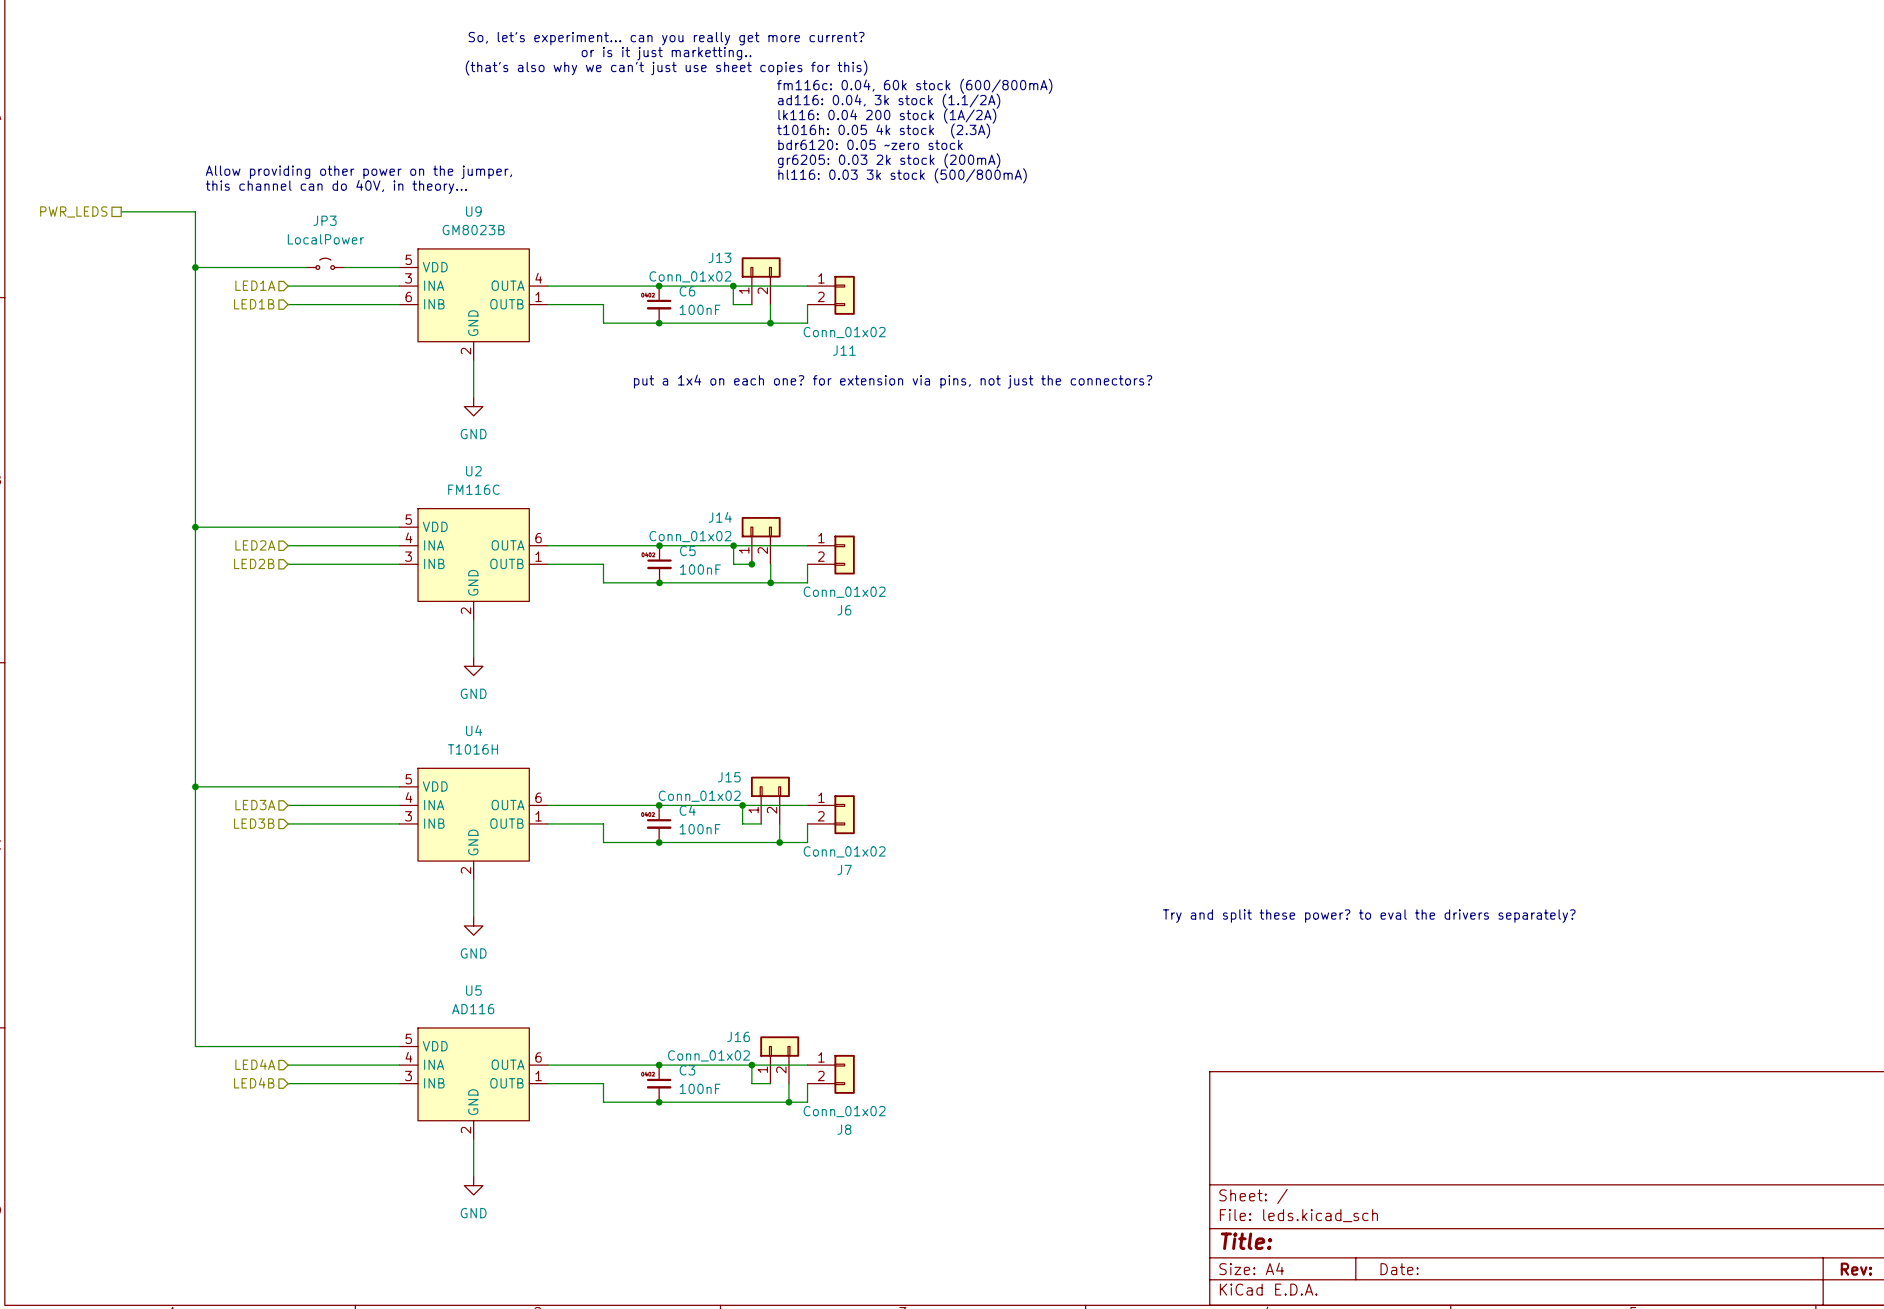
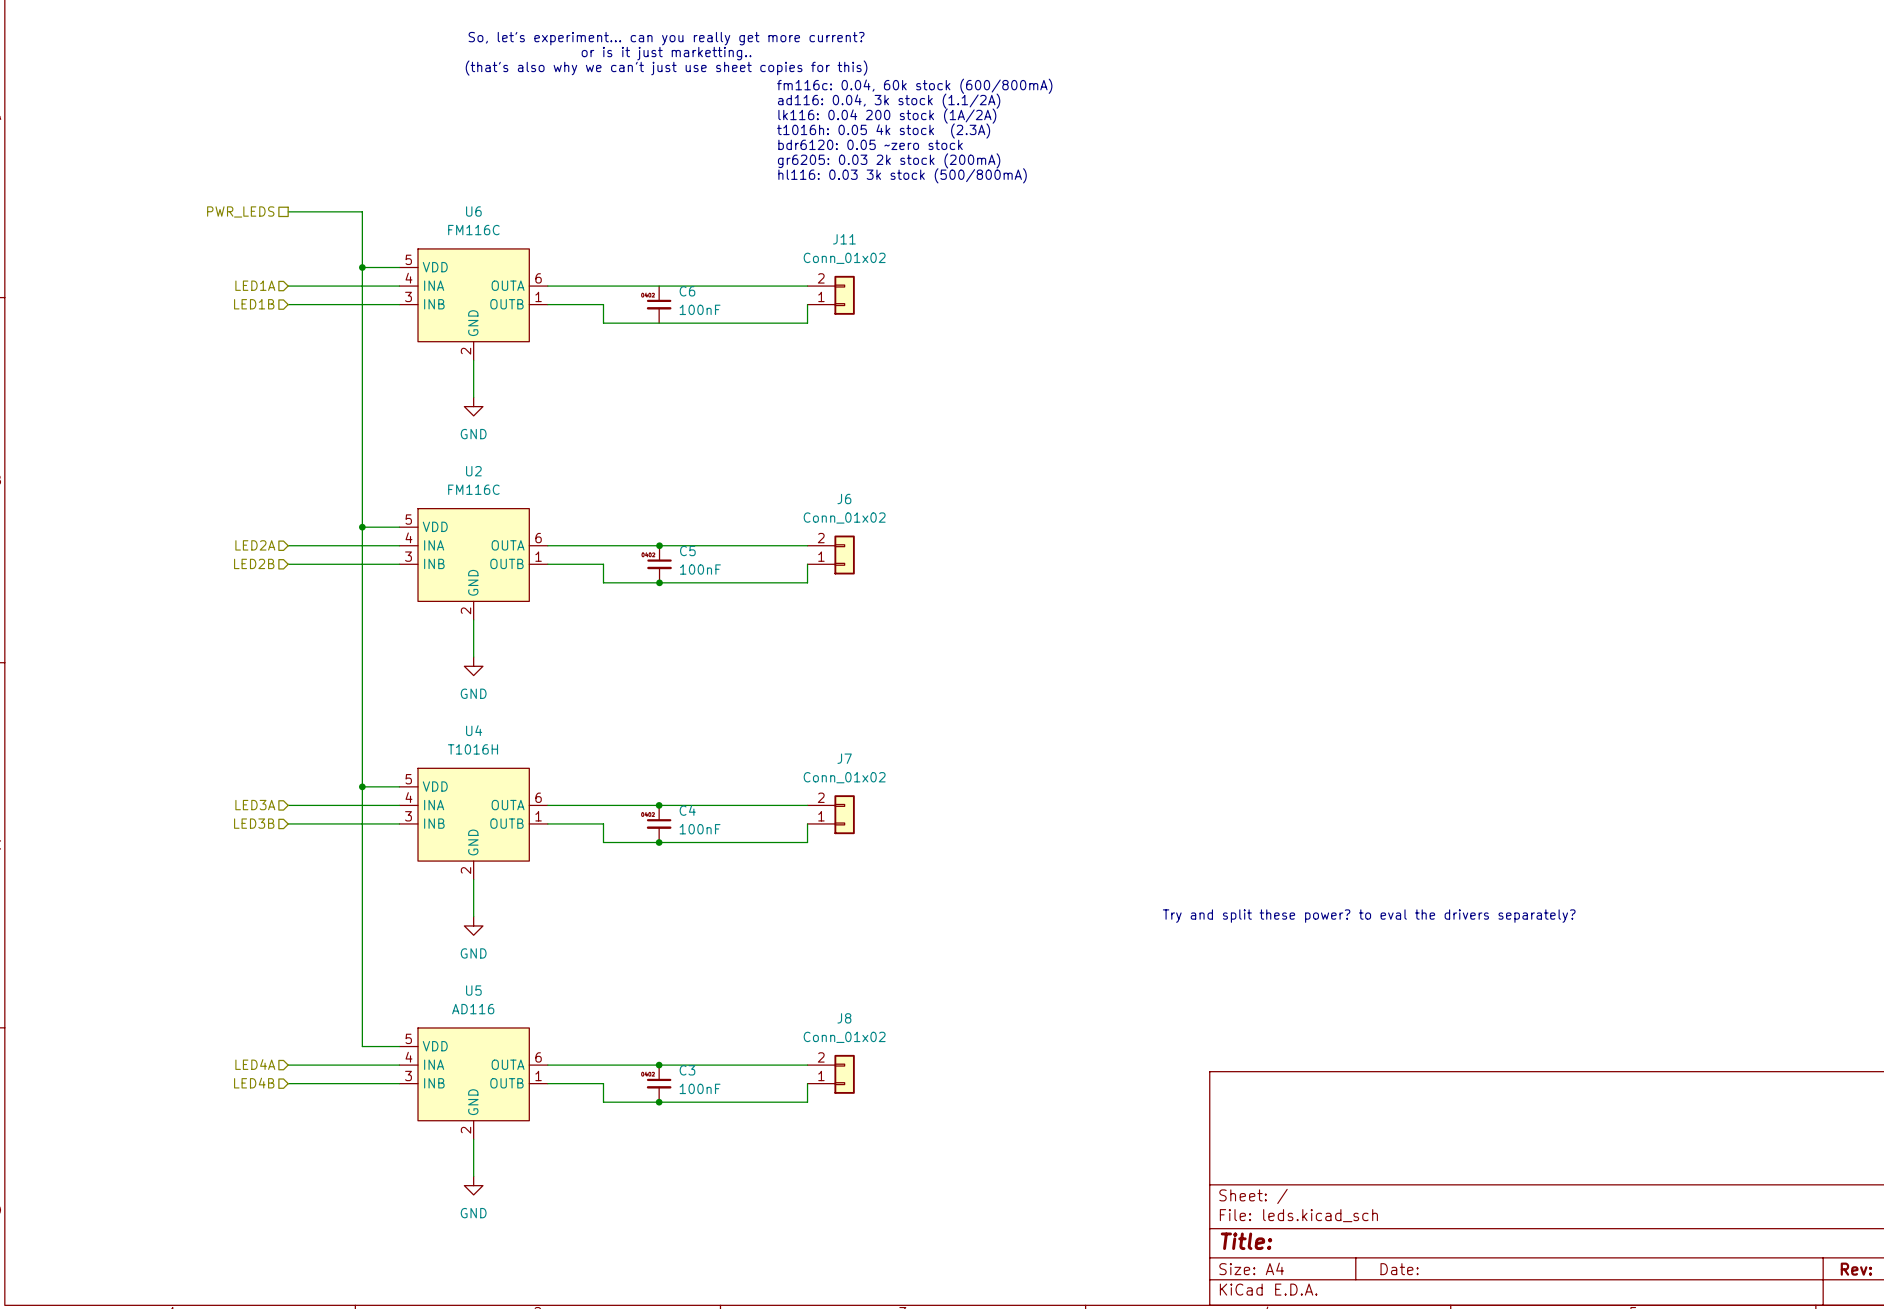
text: Allow providing other power on the jumper, (358, 172) -> none
text: this channel can do 40V, in theory... (336, 186) -> none
hierarchical label position: PWR_LEDS (73, 211) -> PWR_LEDS (240, 211)
wire: (121, 211) (195, 211) (195, 1046) (362, 1046) -> (288, 211) (362, 211) (362, 1046)
U9 name: U9 (473, 211) -> U6 (473, 211)
U9 value: GM8023B (473, 230) -> FM116C (473, 230)
JP3: LocalPower (325, 263) -> none
wire: (195, 267) (306, 267) -> none
junction: (195, 267) -> none
wire: (343, 267) (362, 267) -> none
junction: none -> (362, 267)
U9 pin number: 3 (408, 278) -> 4 (408, 278)
U9 pin number: 4 (538, 278) -> 6 (538, 278)
J13: Conn_01x02 (761, 280) -> none
junction: (659, 286) -> none
wire: (733, 286) (733, 304) (751, 304) -> none
junction: (733, 286) -> none
J11 flip: as is (844, 295) -> up-down (844, 295)
U9 pin number: 6 (408, 296) -> 3 (408, 296)
wire: (770, 304) (770, 323) -> none
junction: (659, 323) -> none
junction: (770, 323) -> none
text: put a 1x4 on each one? for extension via pins, not just the connectors? (893, 381) -> none
wire: (195, 527) (362, 527) -> none
junction: (195, 527) -> none
junction: none -> (362, 527)
J14: Conn_01x02 (761, 540) -> none
wire: (733, 545) (733, 564) (752, 564) -> none
junction: (733, 545) -> none
J6 flip: as is (844, 555) -> up-down (844, 555)
junction: (751, 564) -> none
wire: (770, 564) (770, 582) -> none
junction: (770, 582) -> none
wire: (195, 786) (362, 786) -> none
junction: (195, 786) -> none
junction: none -> (362, 786)
J15: Conn_01x02 (770, 800) -> none
wire: (742, 805) (742, 823) (761, 823) -> none
junction: (742, 805) -> none
J7 flip: as is (844, 814) -> up-down (844, 814)
wire: (779, 823) (779, 842) -> none
junction: (779, 842) -> none
J16: Conn_01x02 (779, 1059) -> none
wire: (751, 1065) (751, 1083) (770, 1083) -> none
junction: (751, 1065) -> none
J8 flip: as is (844, 1074) -> up-down (844, 1074)
wire: (788, 1083) (788, 1102) -> none
junction: (788, 1102) -> none

